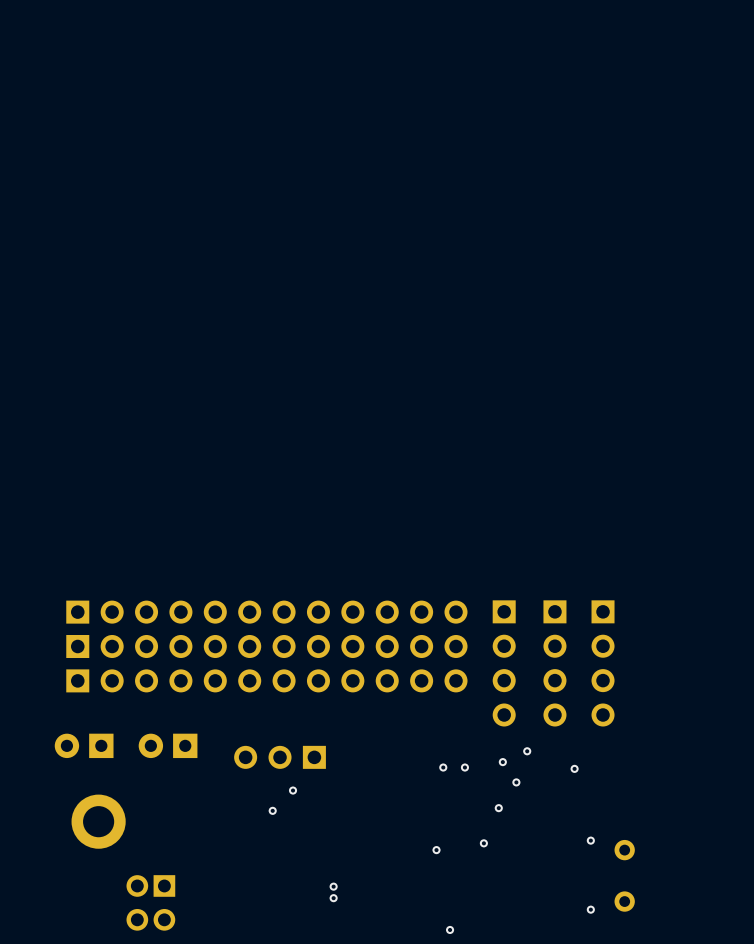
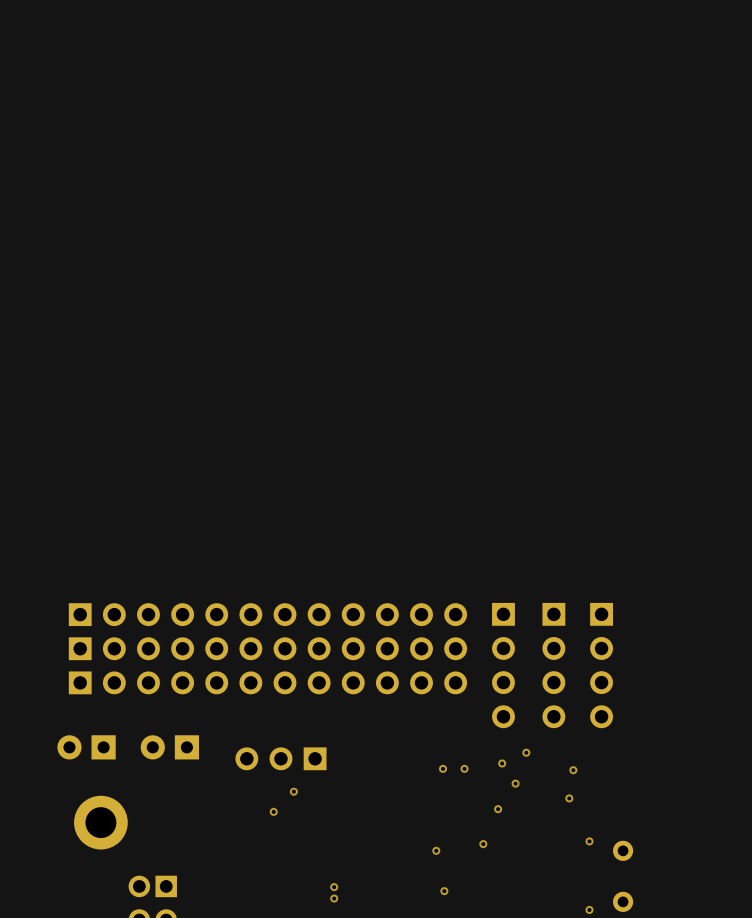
via: none -> (569, 798)
via: none -> (444, 891)

